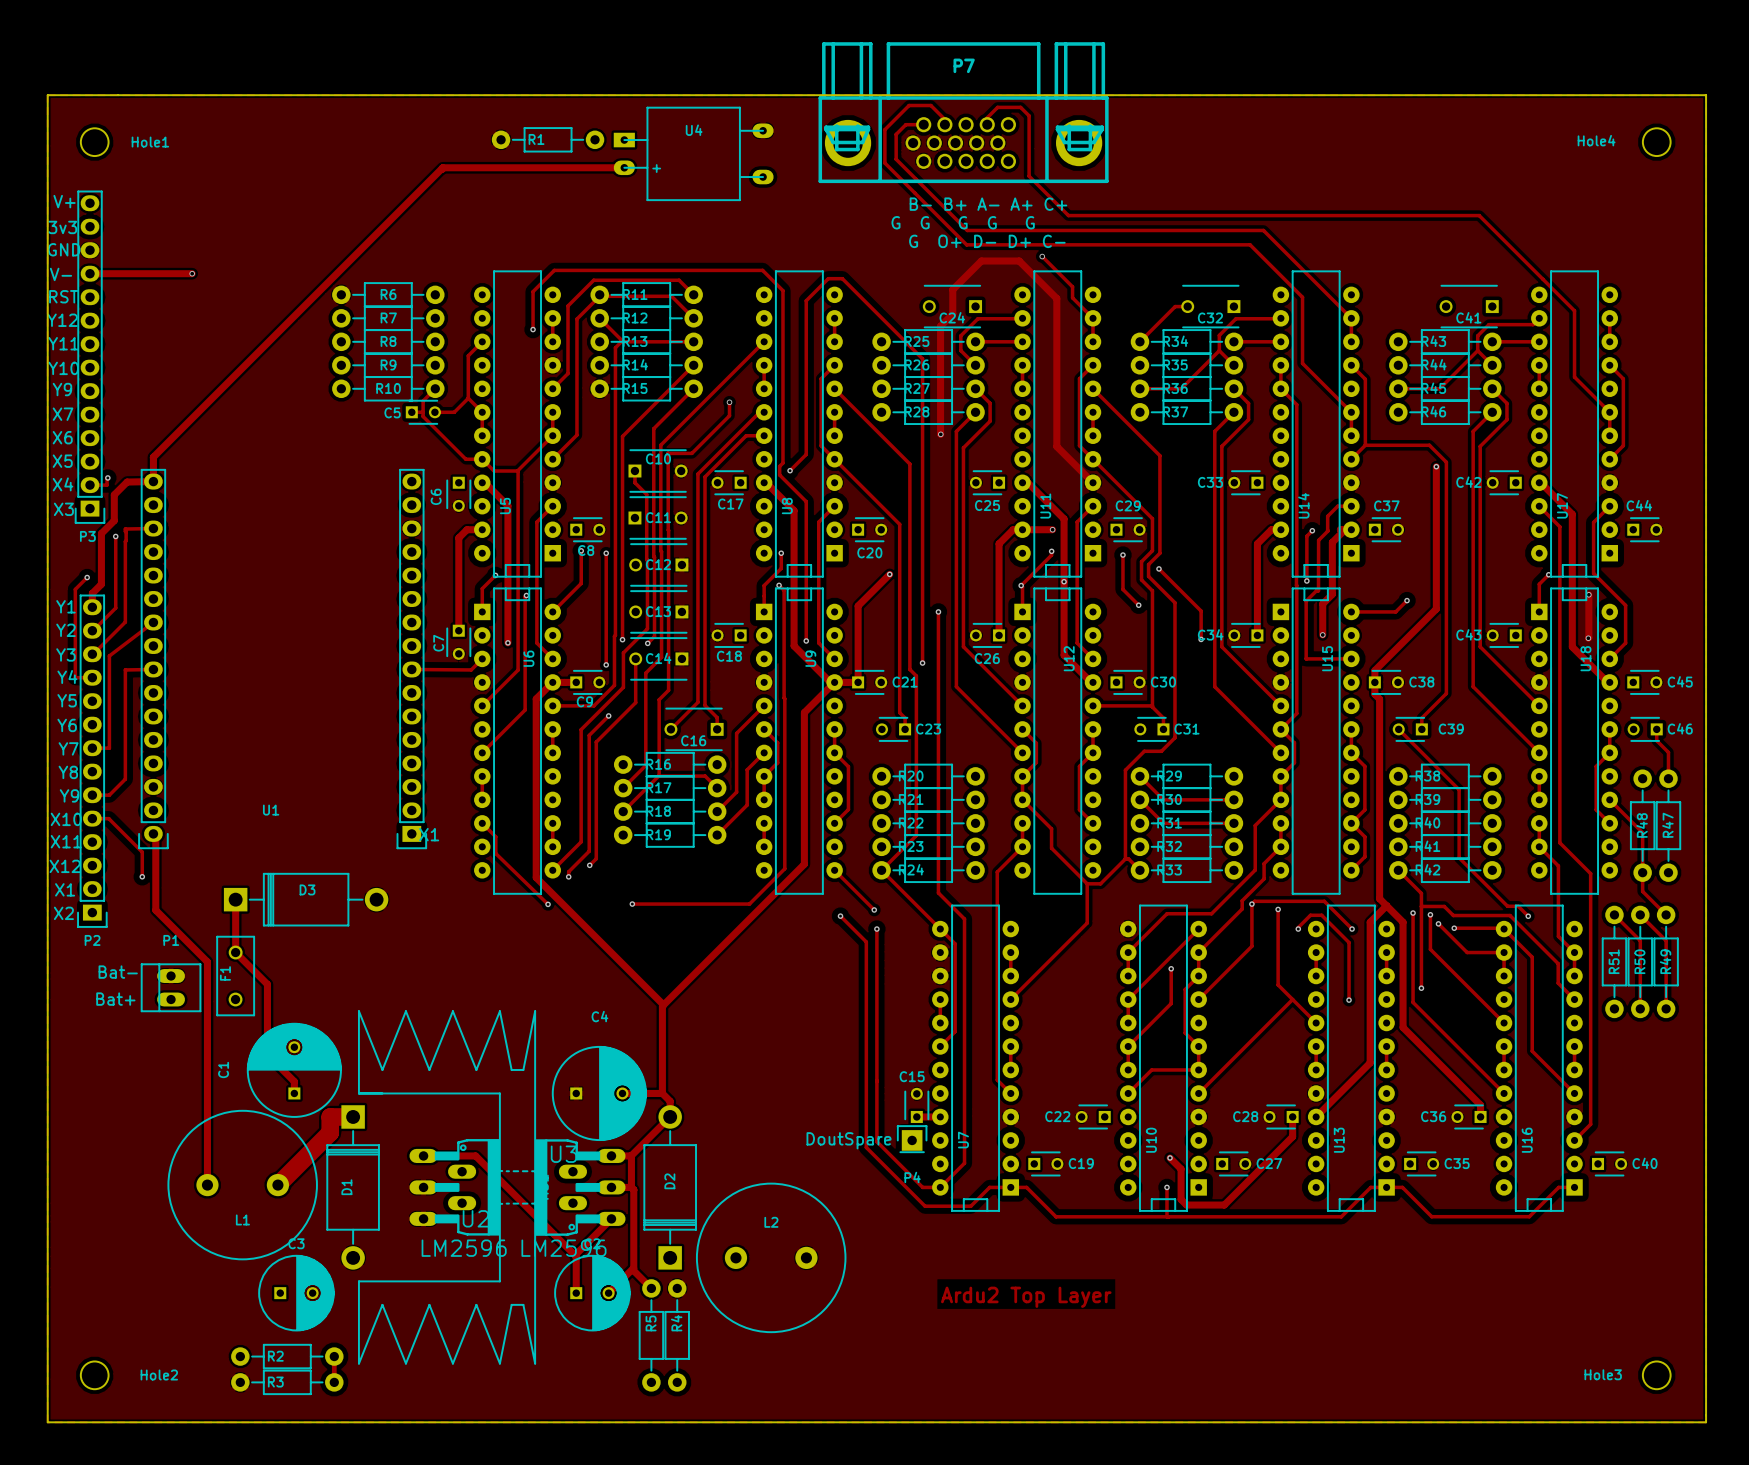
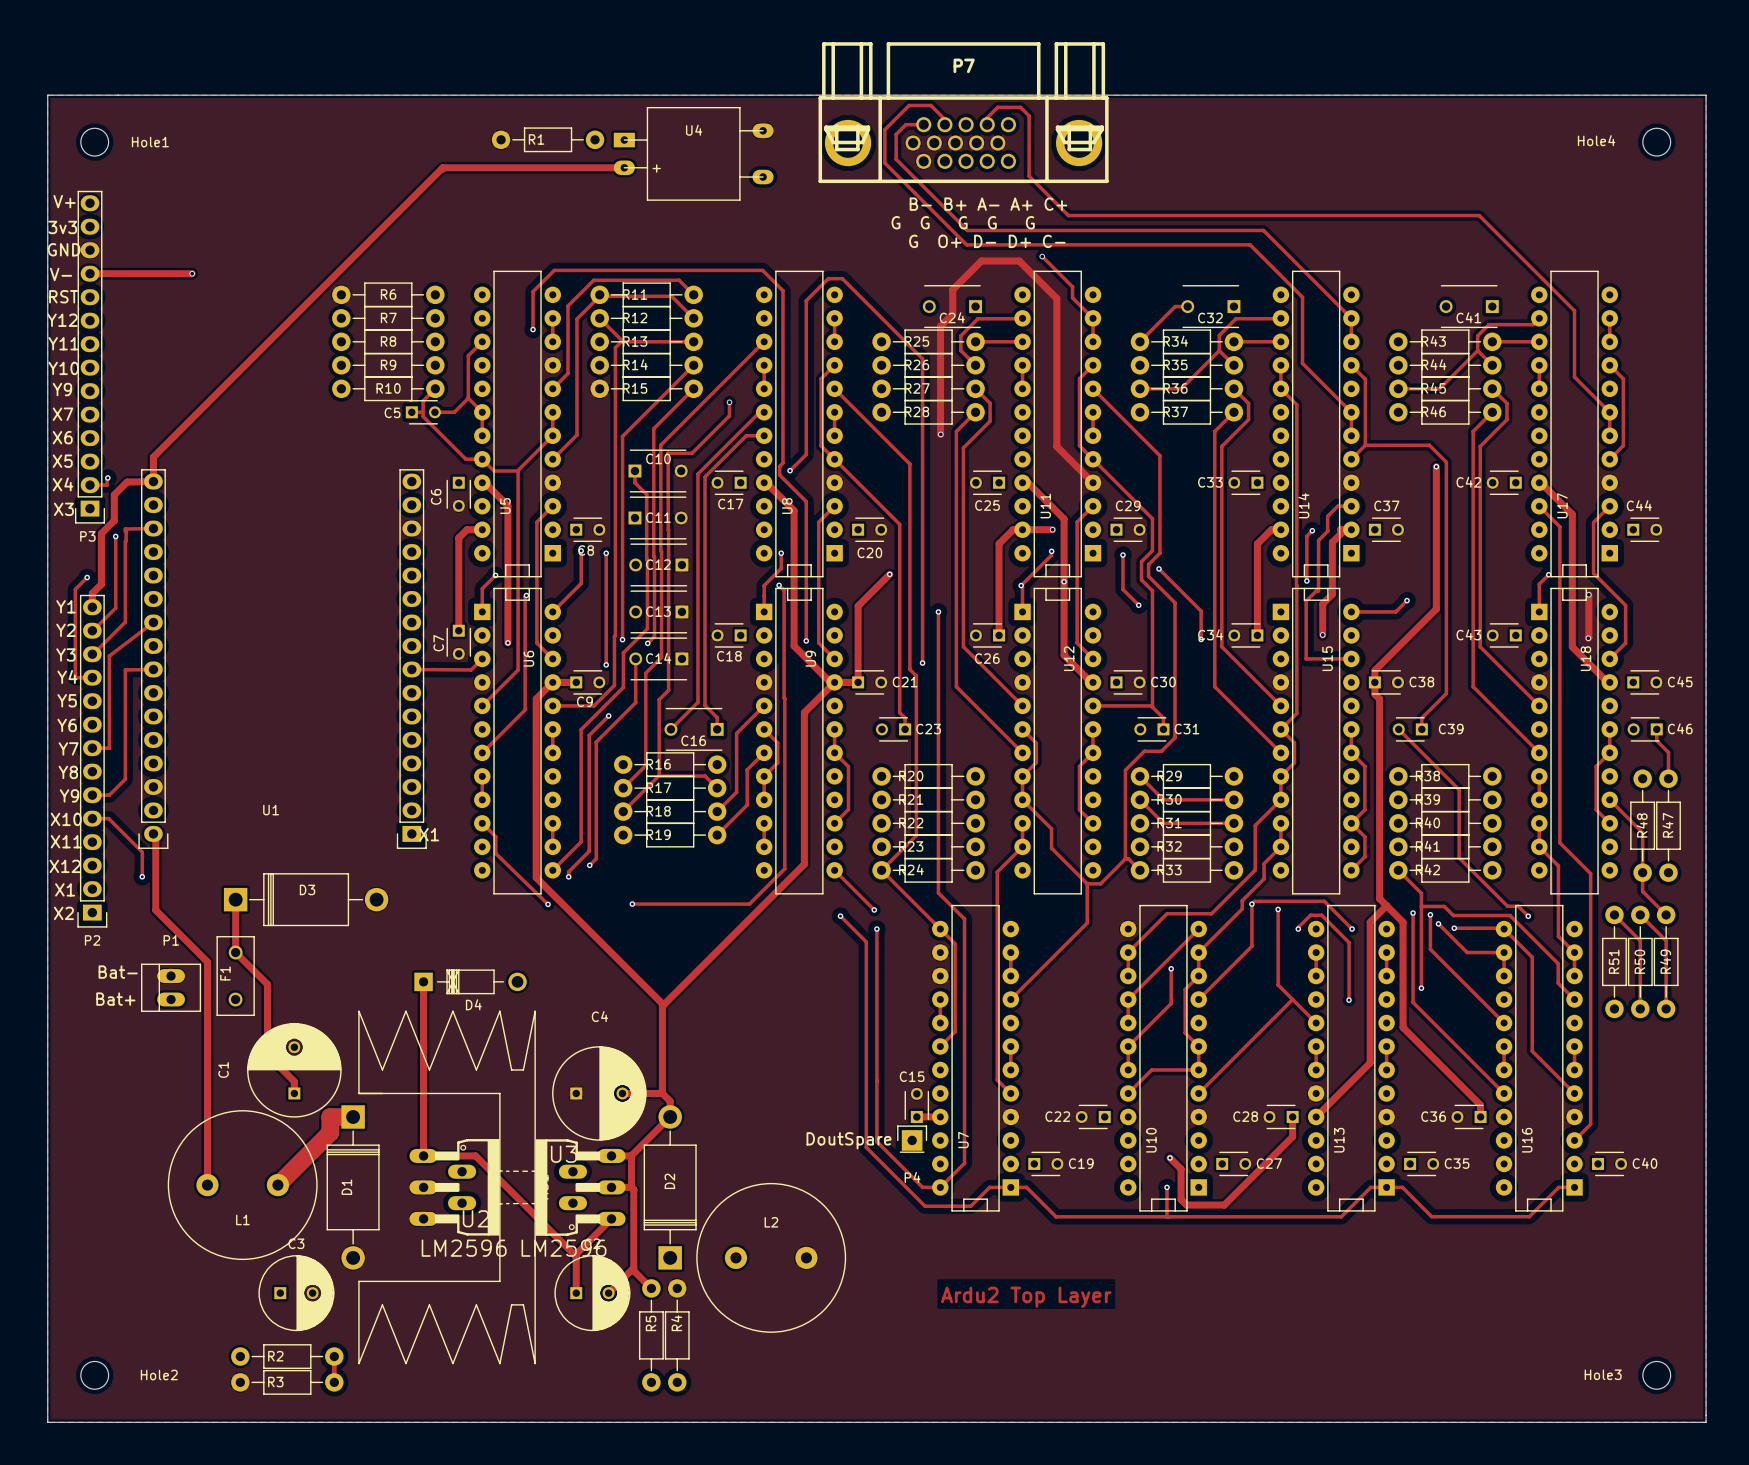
track: none -> (423, 981) (423, 1155)
D4: none -> (470, 981)

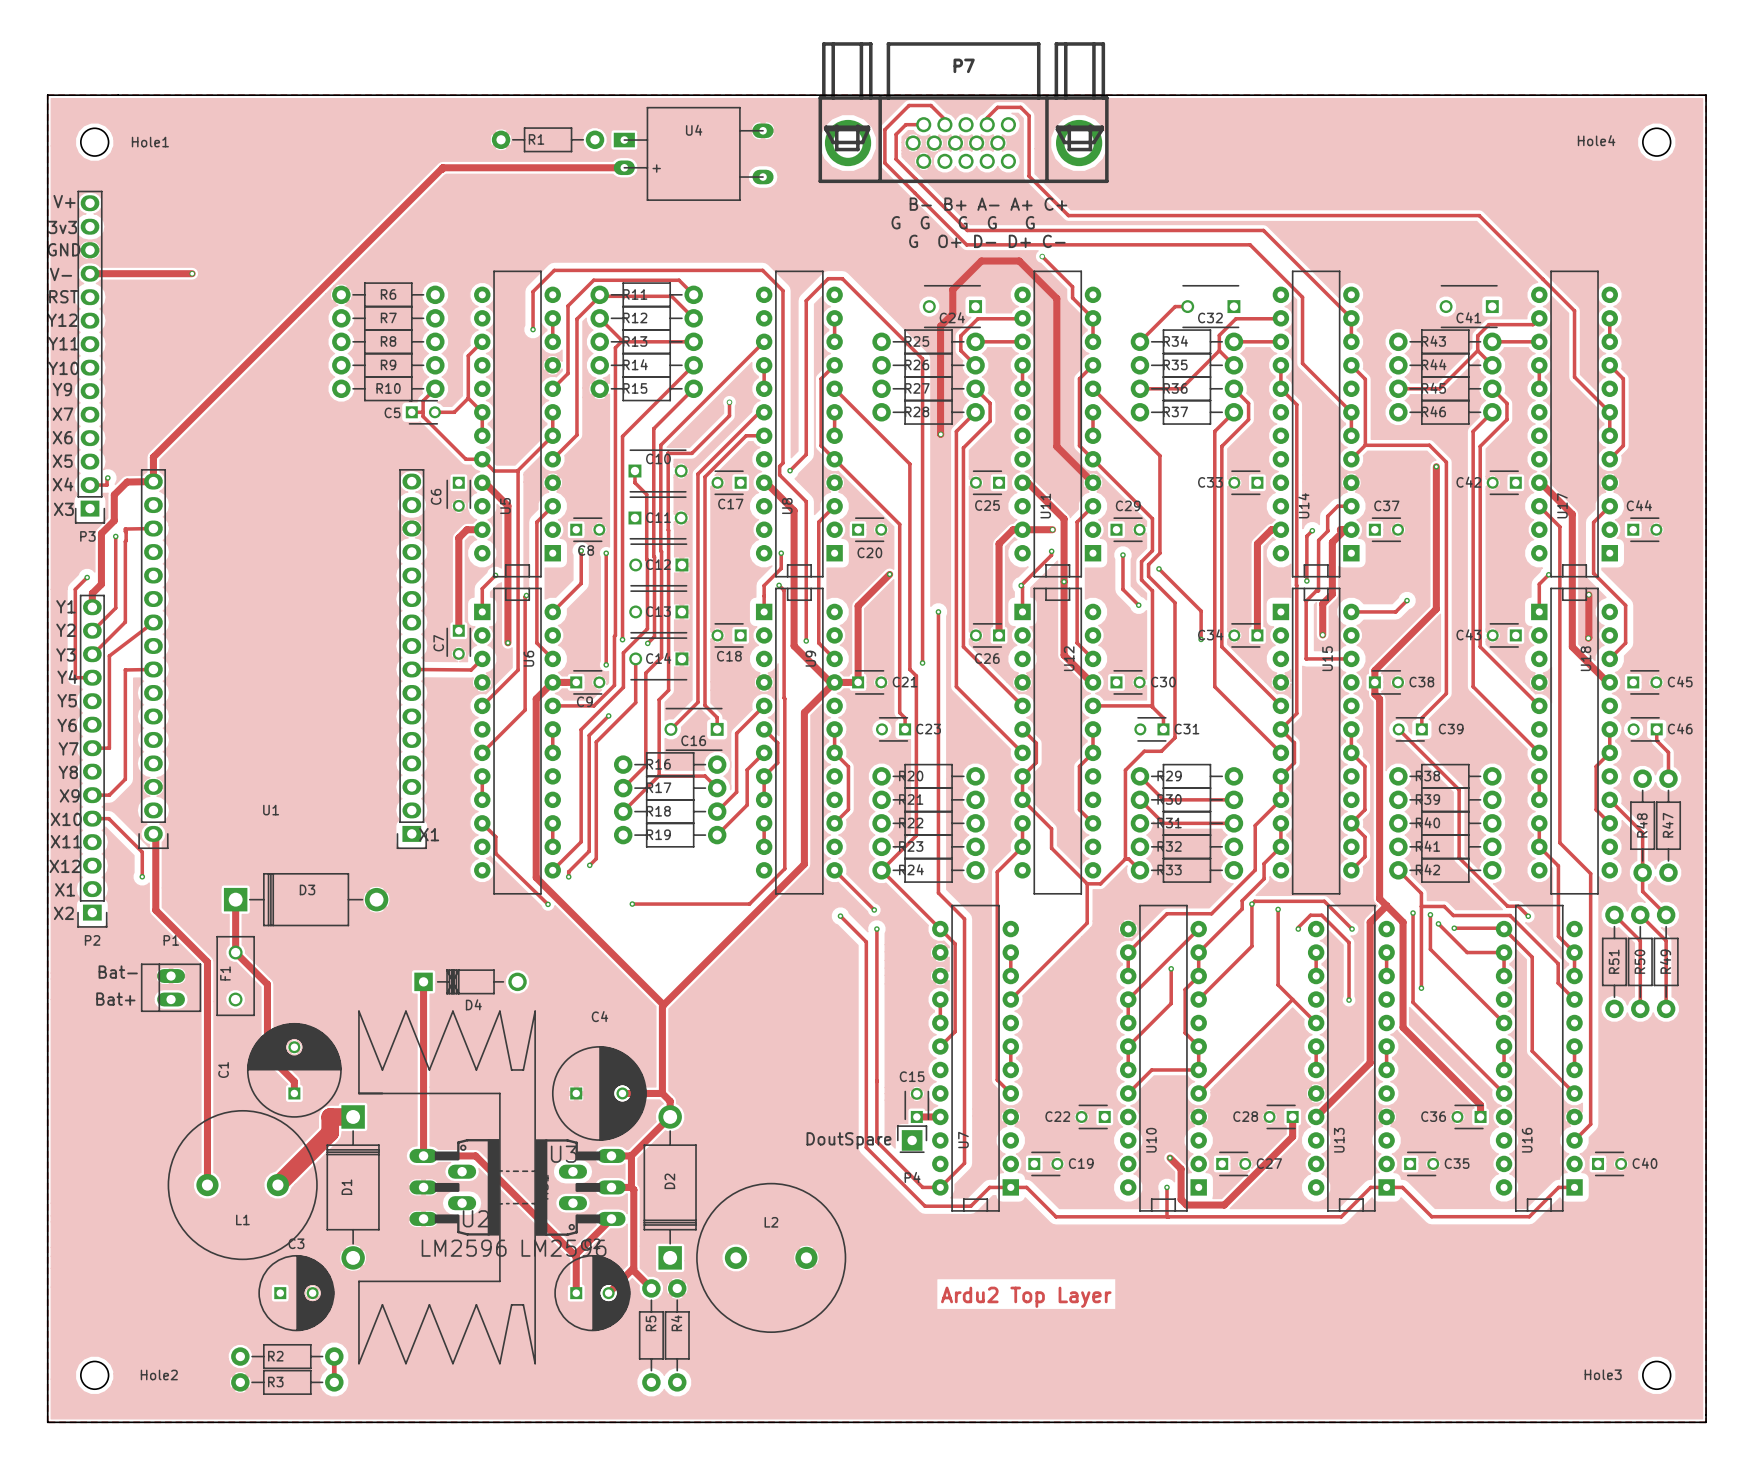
text: Y9 (69, 795) -> X9 (69, 795)

